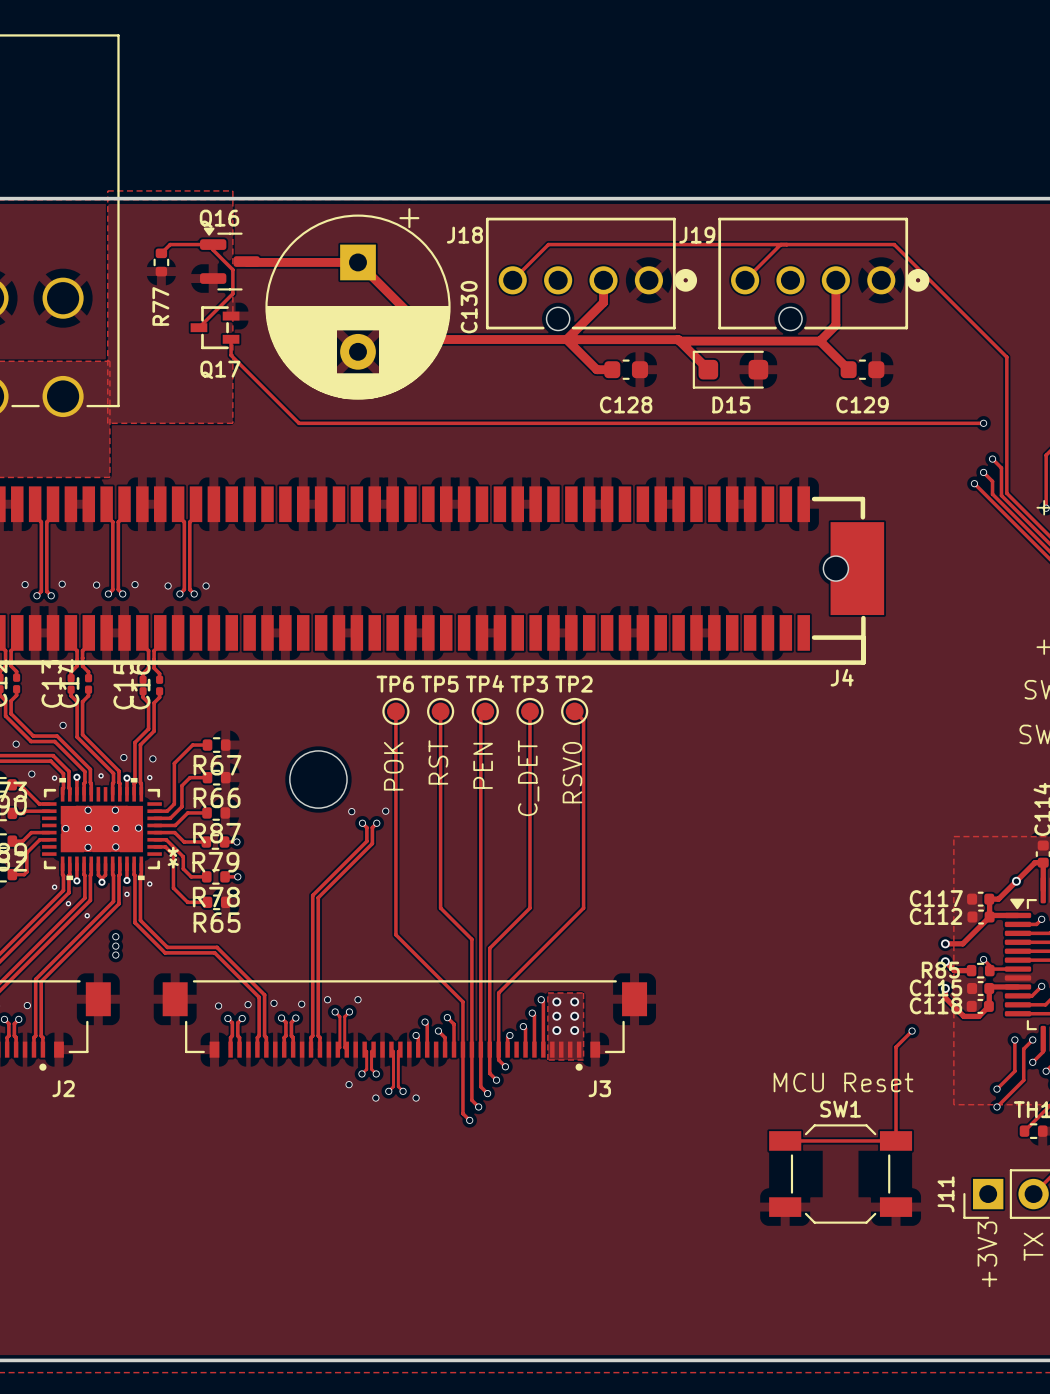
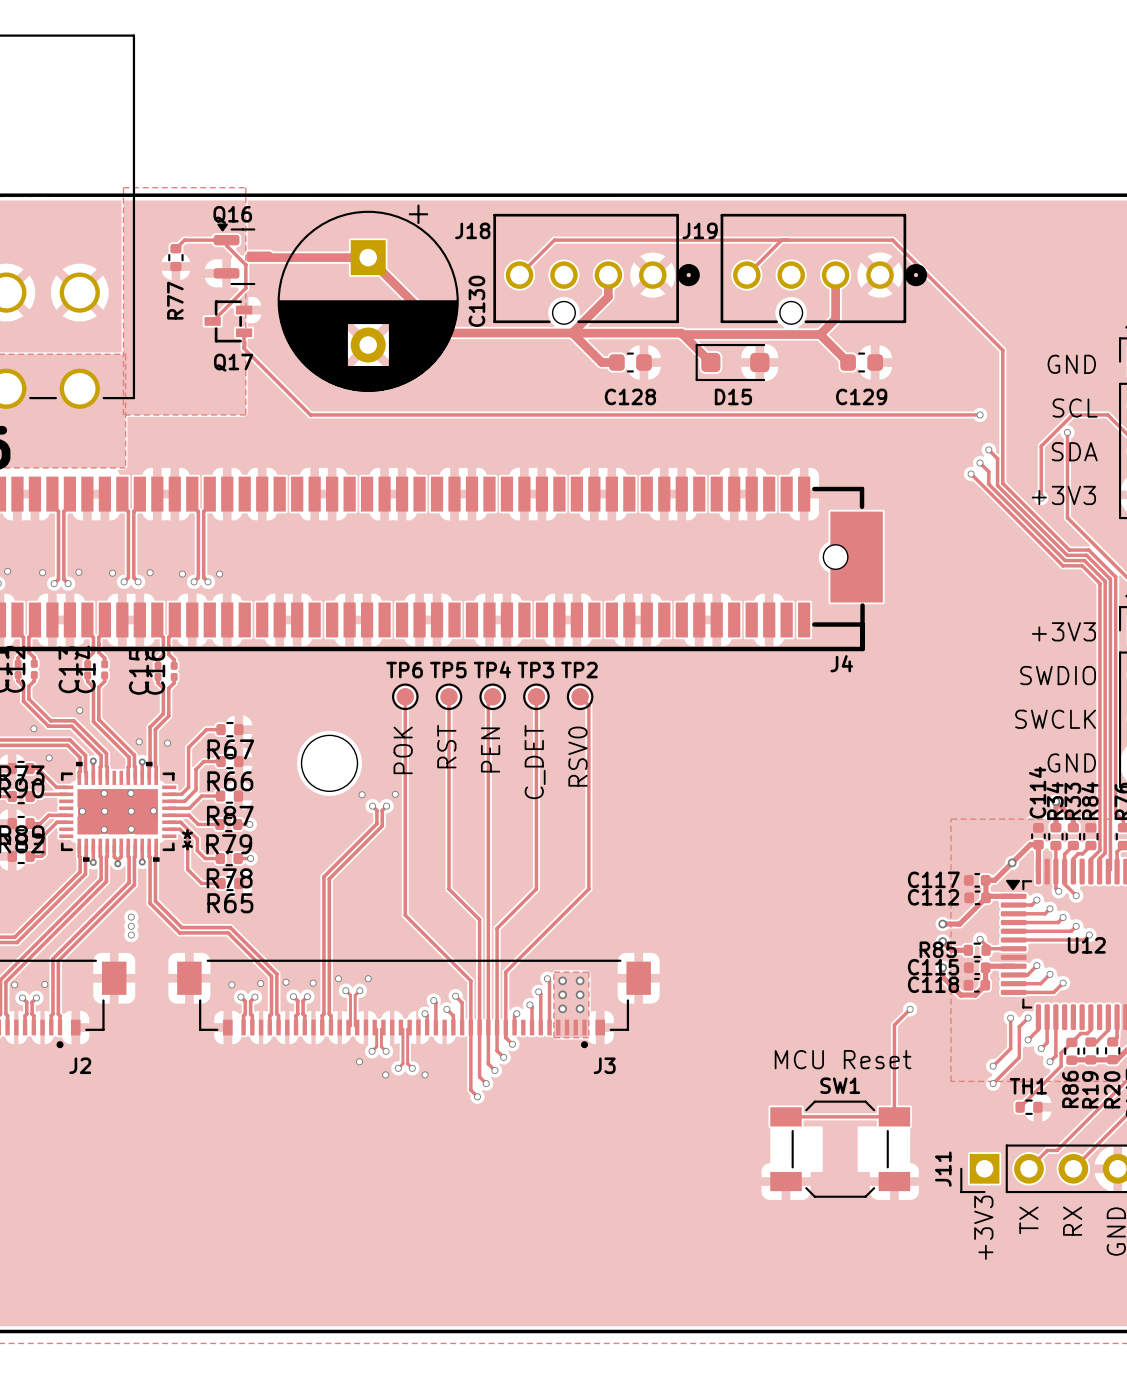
via: (101, 775) -> none
via: (149, 777) -> none
via: (54, 778) -> none
via: (149, 884) -> none
via: (54, 887) -> none
via: (126, 894) -> none
via: (68, 903) -> none
via: (87, 915) -> none

